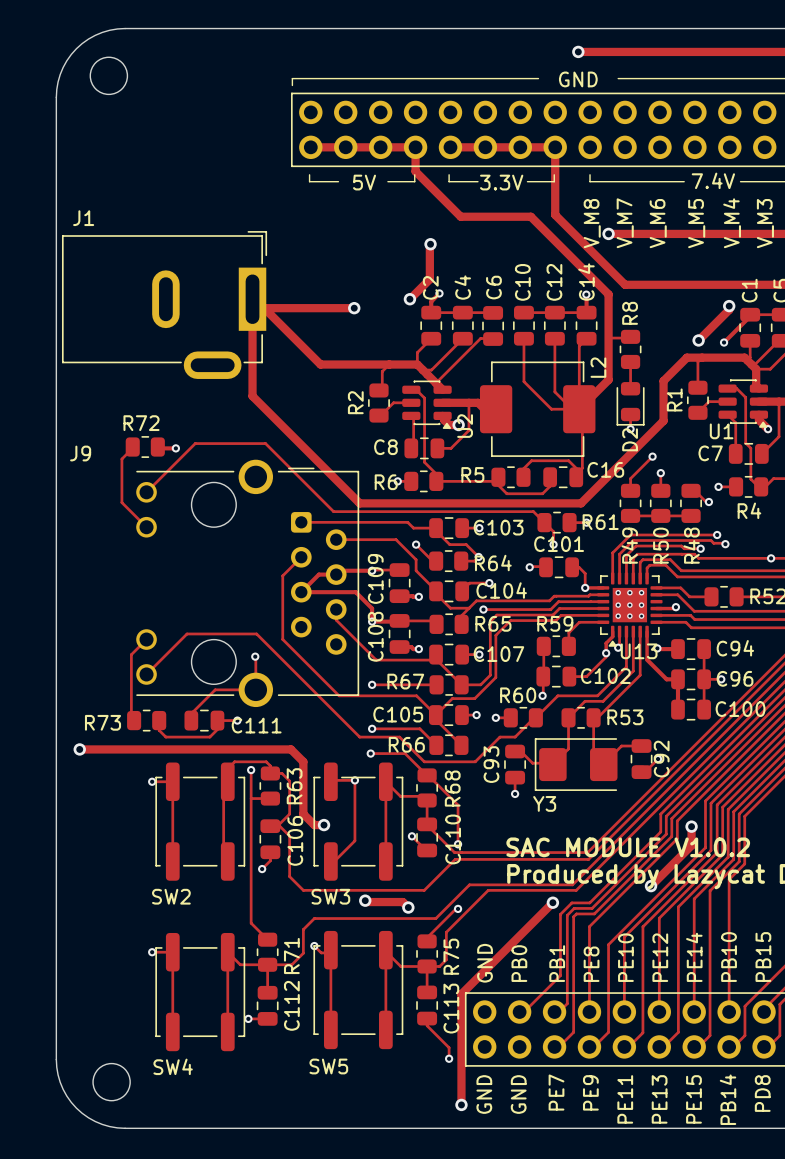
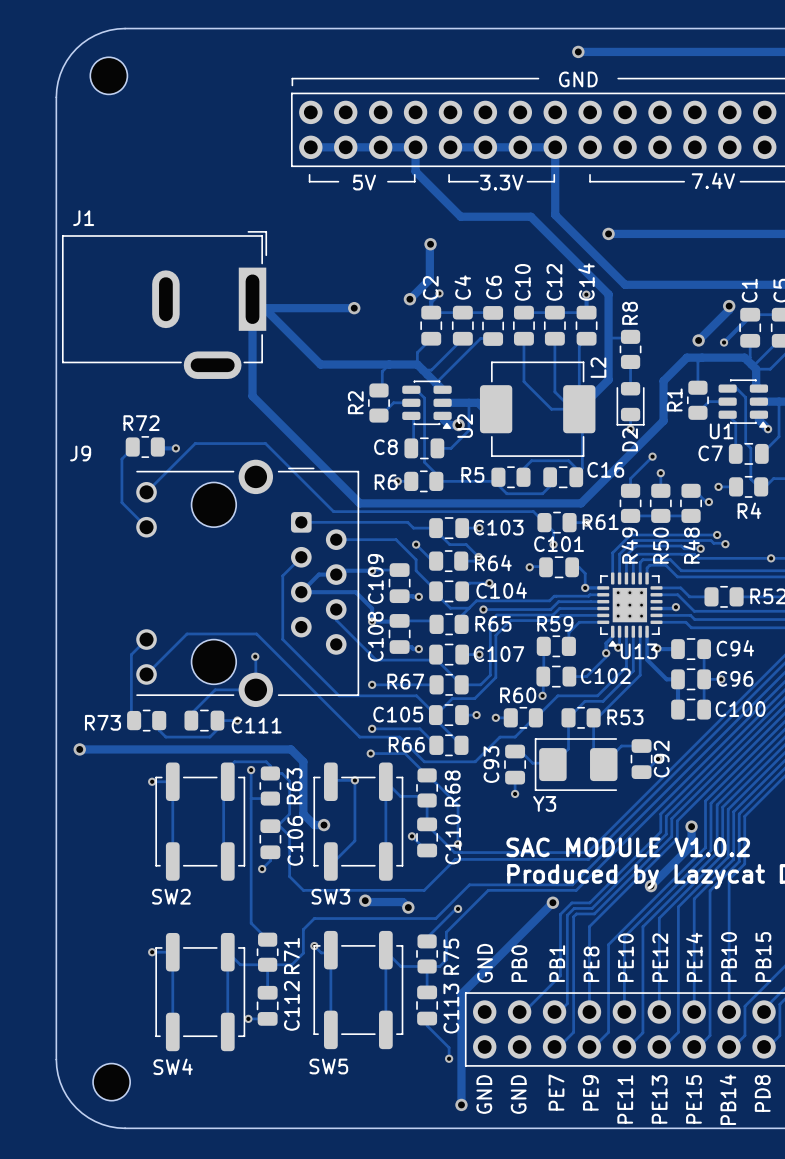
text: V_M8 (592, 223) -> none
text: V_M7 (625, 223) -> none
text: V_M6 (658, 223) -> none
text: V_M5 (696, 223) -> none
text: V_M4 (732, 223) -> none
text: V_M3 (765, 223) -> none

